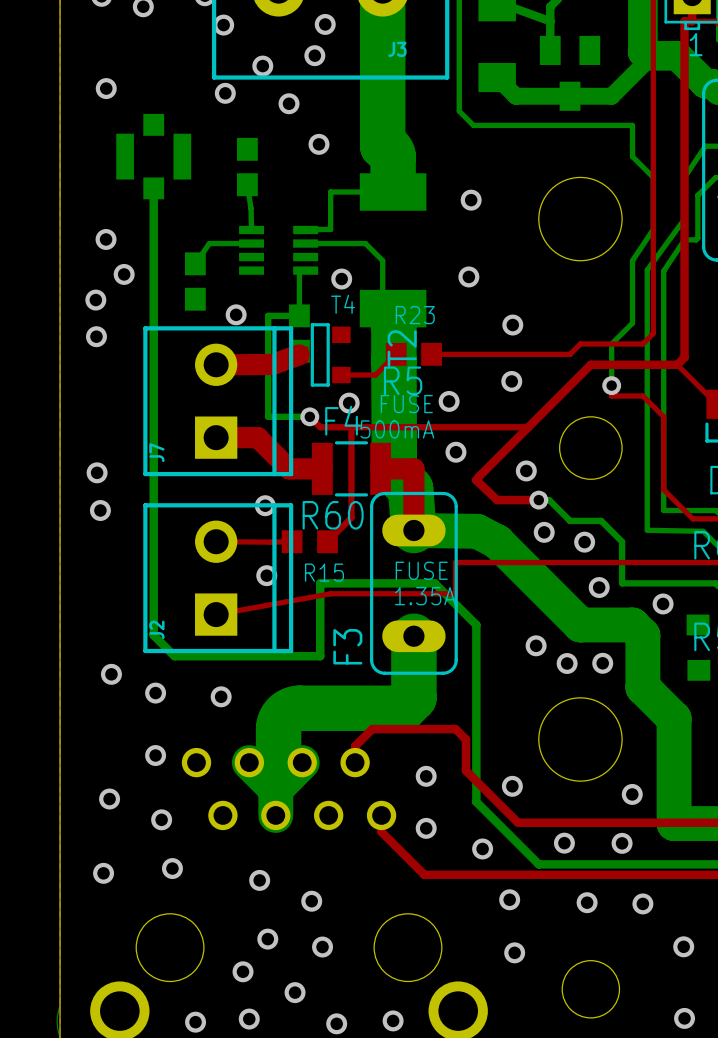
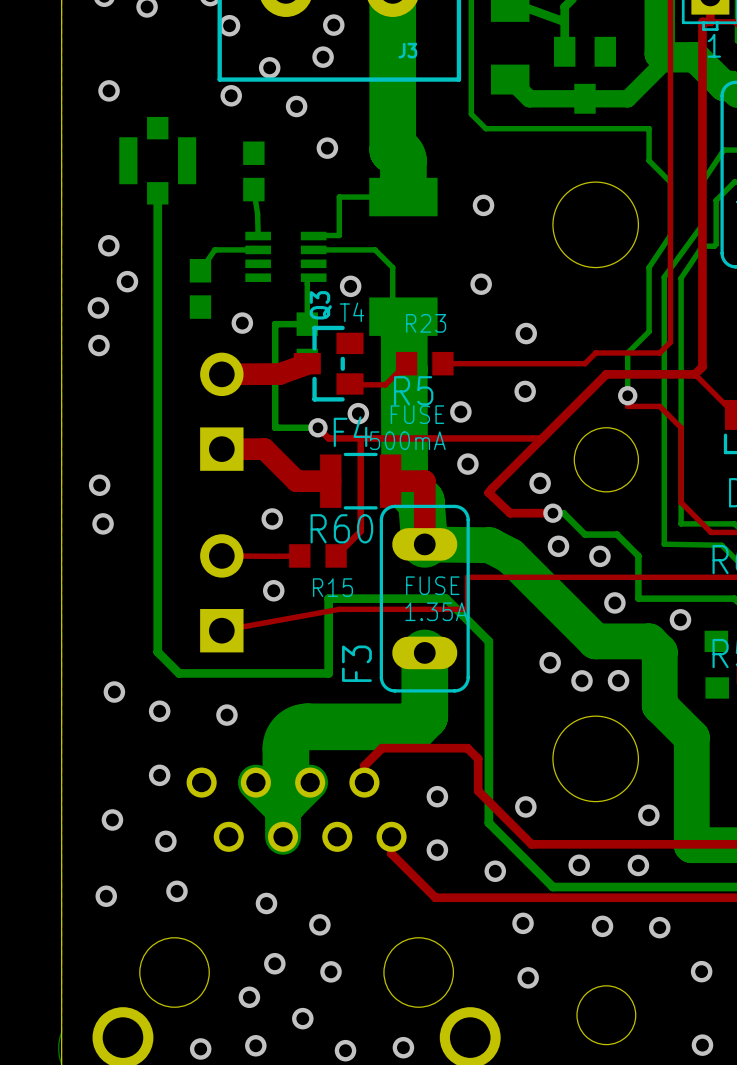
T2: (320, 354) -> none
Q3: none -> (328, 363)
J7 side: top (218, 401) -> bottom (221, 411)
J2 side: top (218, 578) -> bottom (221, 593)

